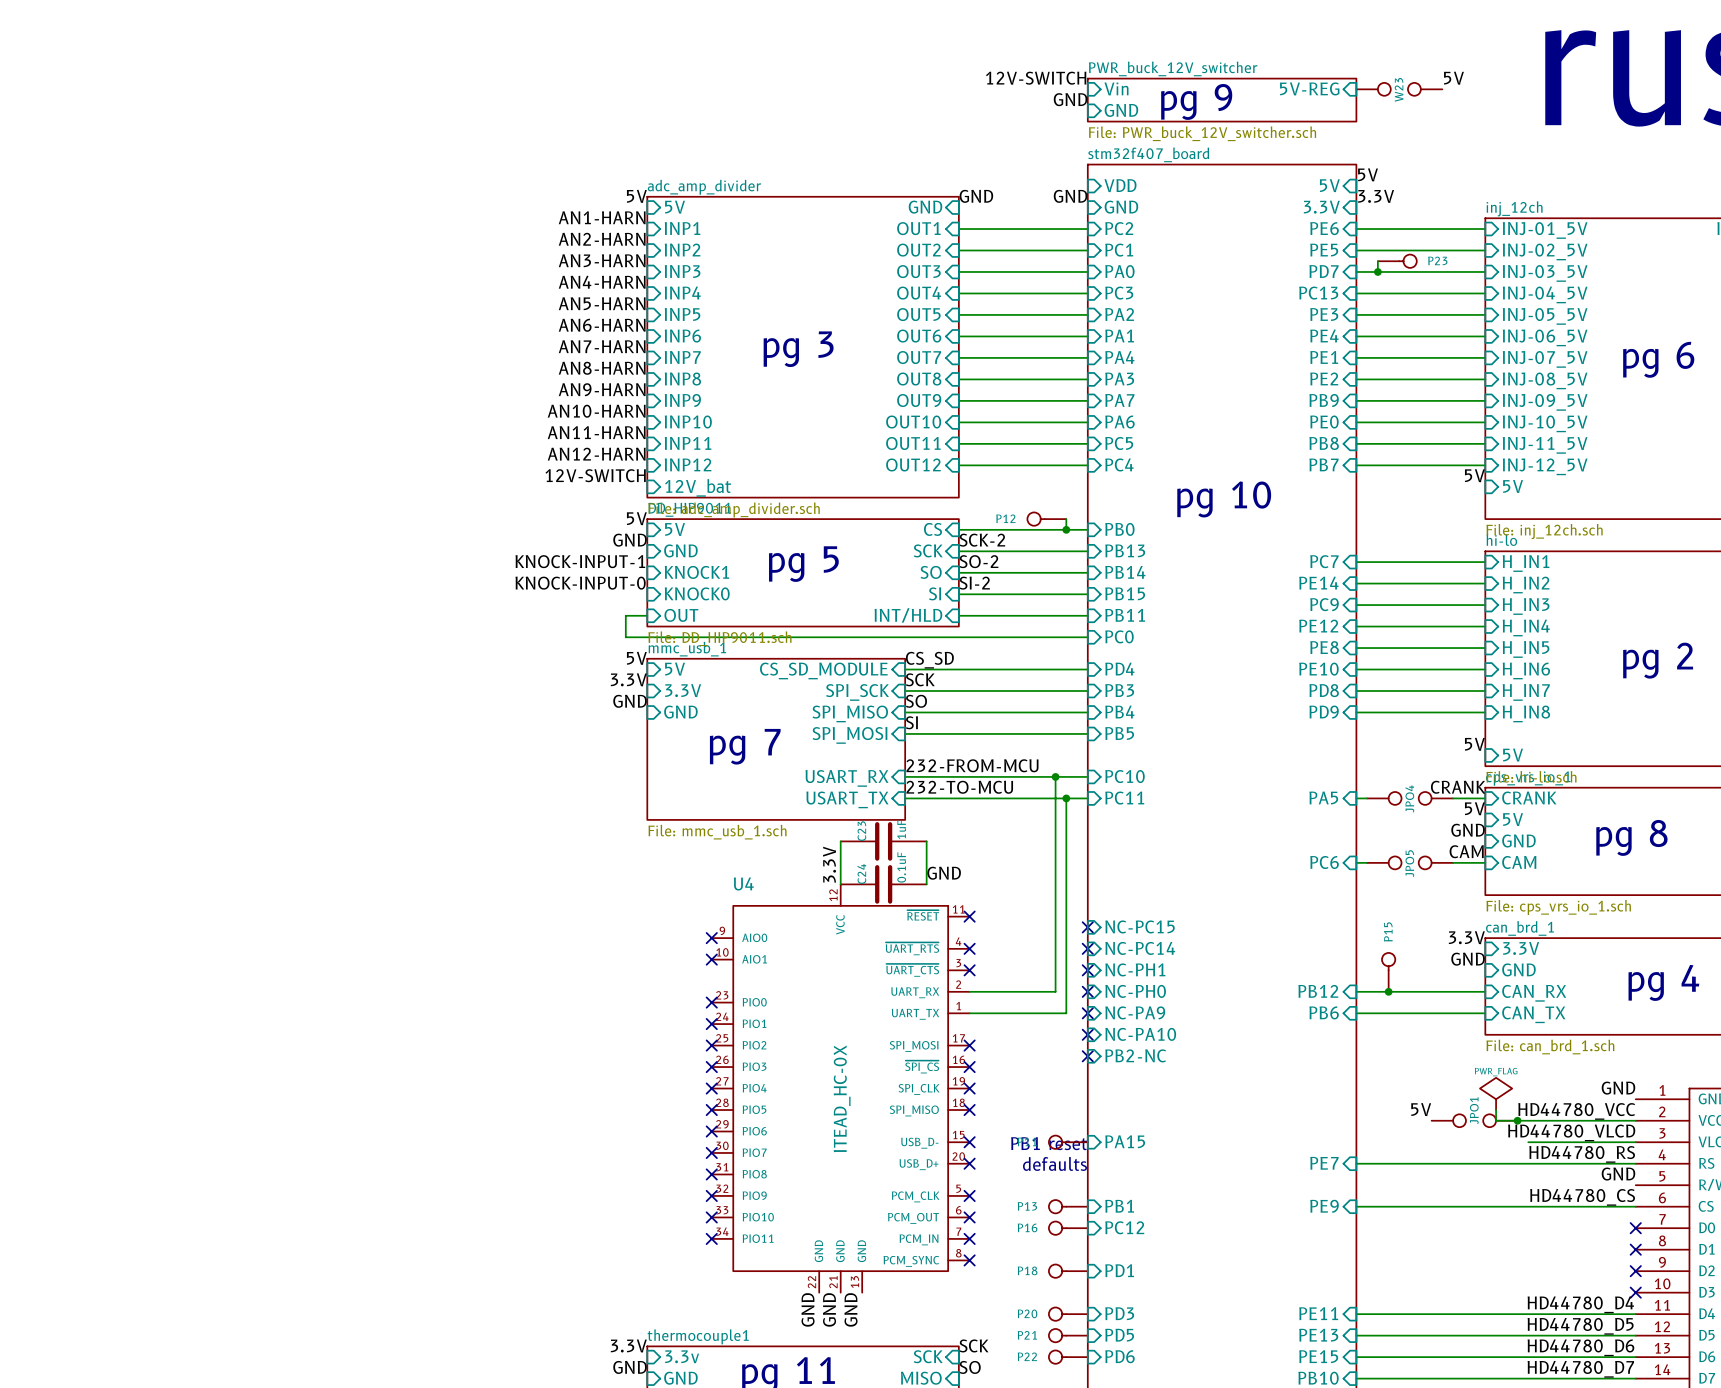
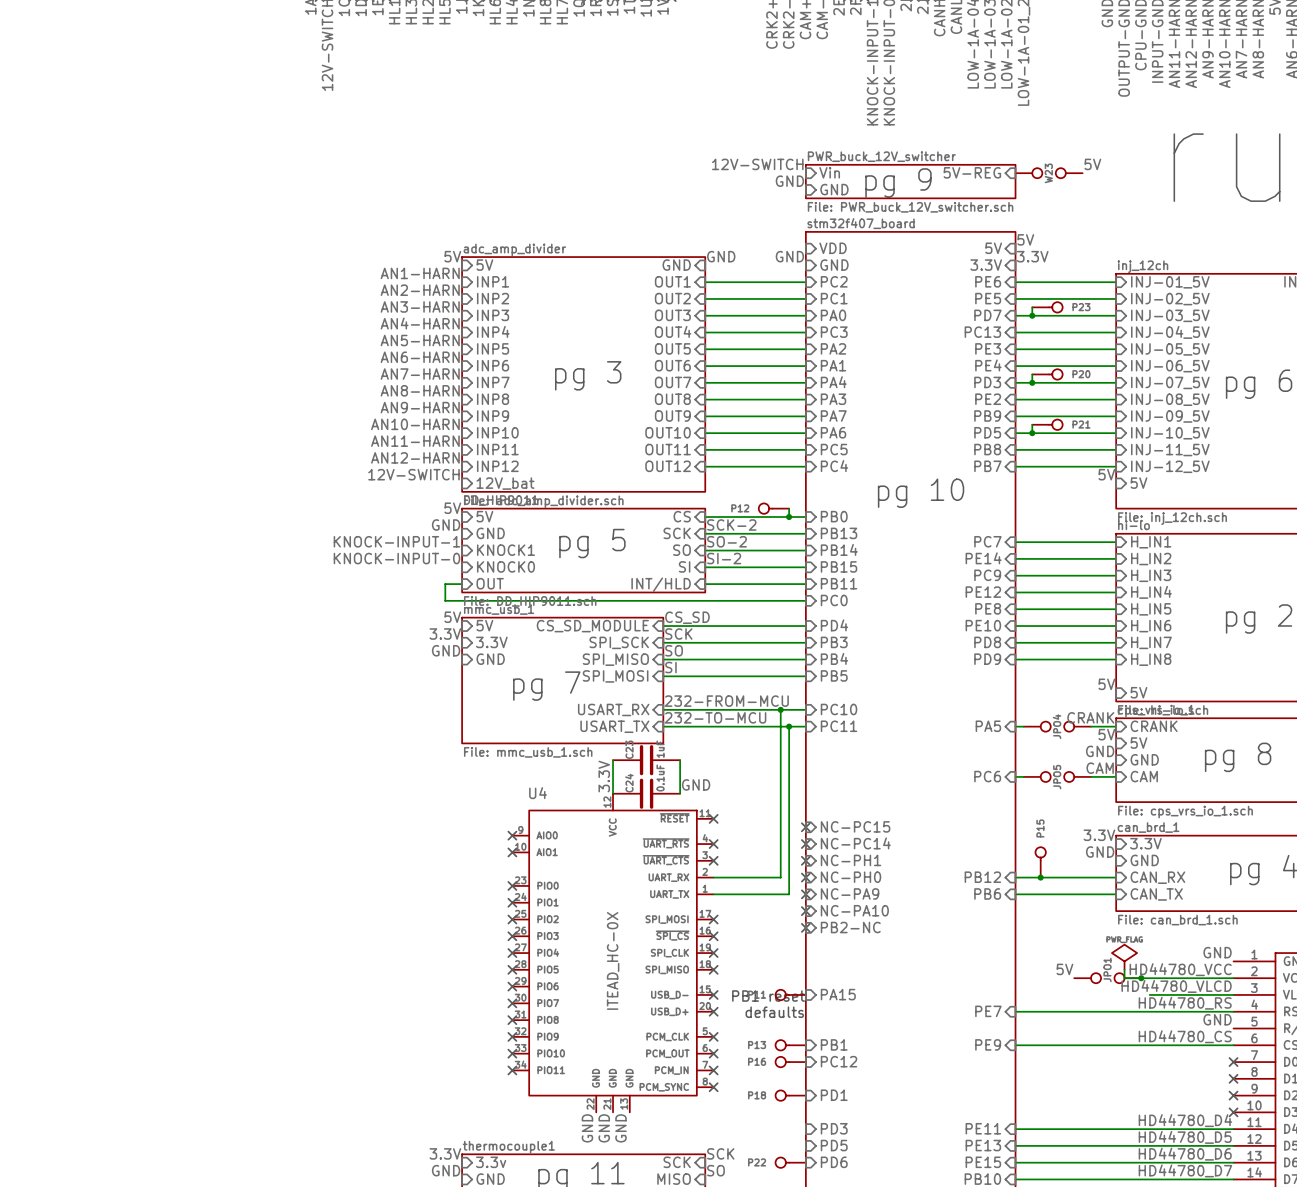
wire: none -> (1032, 374) (1032, 382)
sheet pin: PE1 (1324, 357) -> PD3 (987, 382)
junction: none -> (1032, 382)
wire: none -> (1032, 424) (1032, 433)
sheet pin: PE0 (1324, 422) -> PD5 (987, 432)
junction: none -> (1032, 433)
P20 rotation: 0° (1057, 1314) -> 180° (1055, 374)
P20 position: (1068, 1314) -> (1047, 374)
P21 rotation: 0° (1057, 1335) -> 180° (1055, 424)
P21 position: (1068, 1335) -> (1047, 424)

